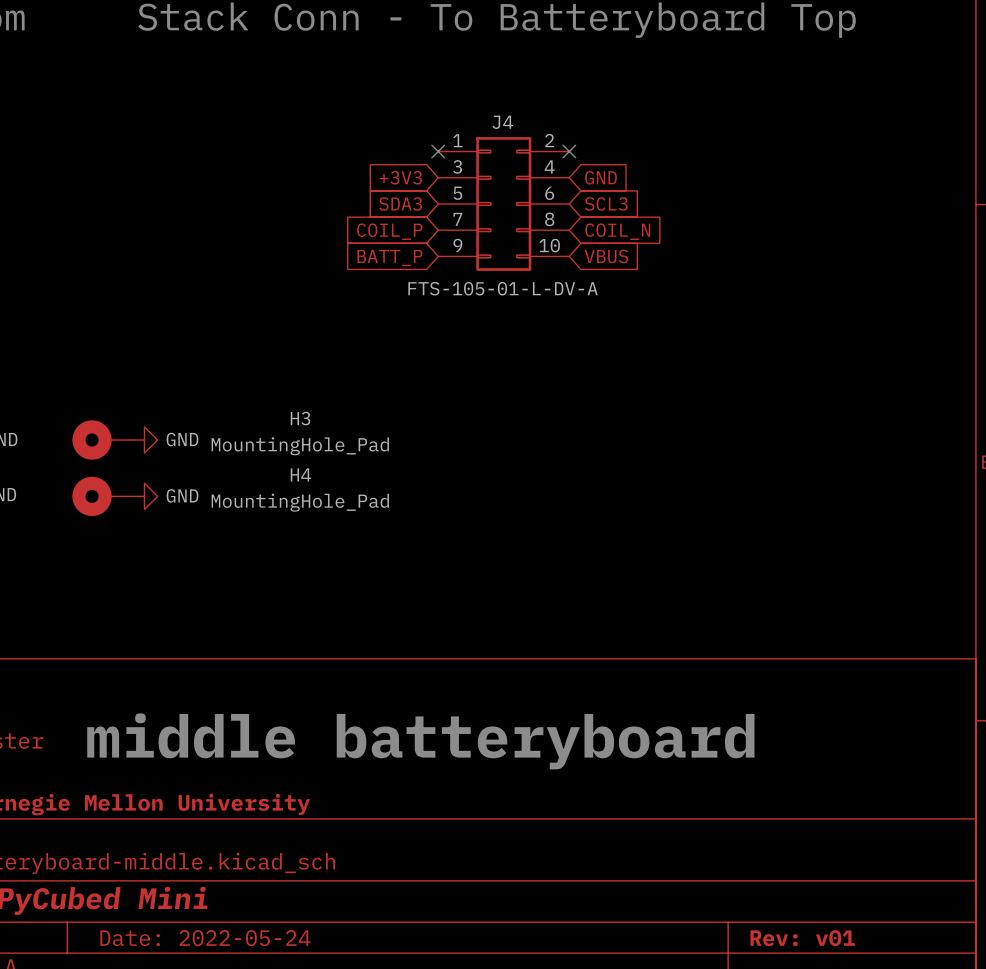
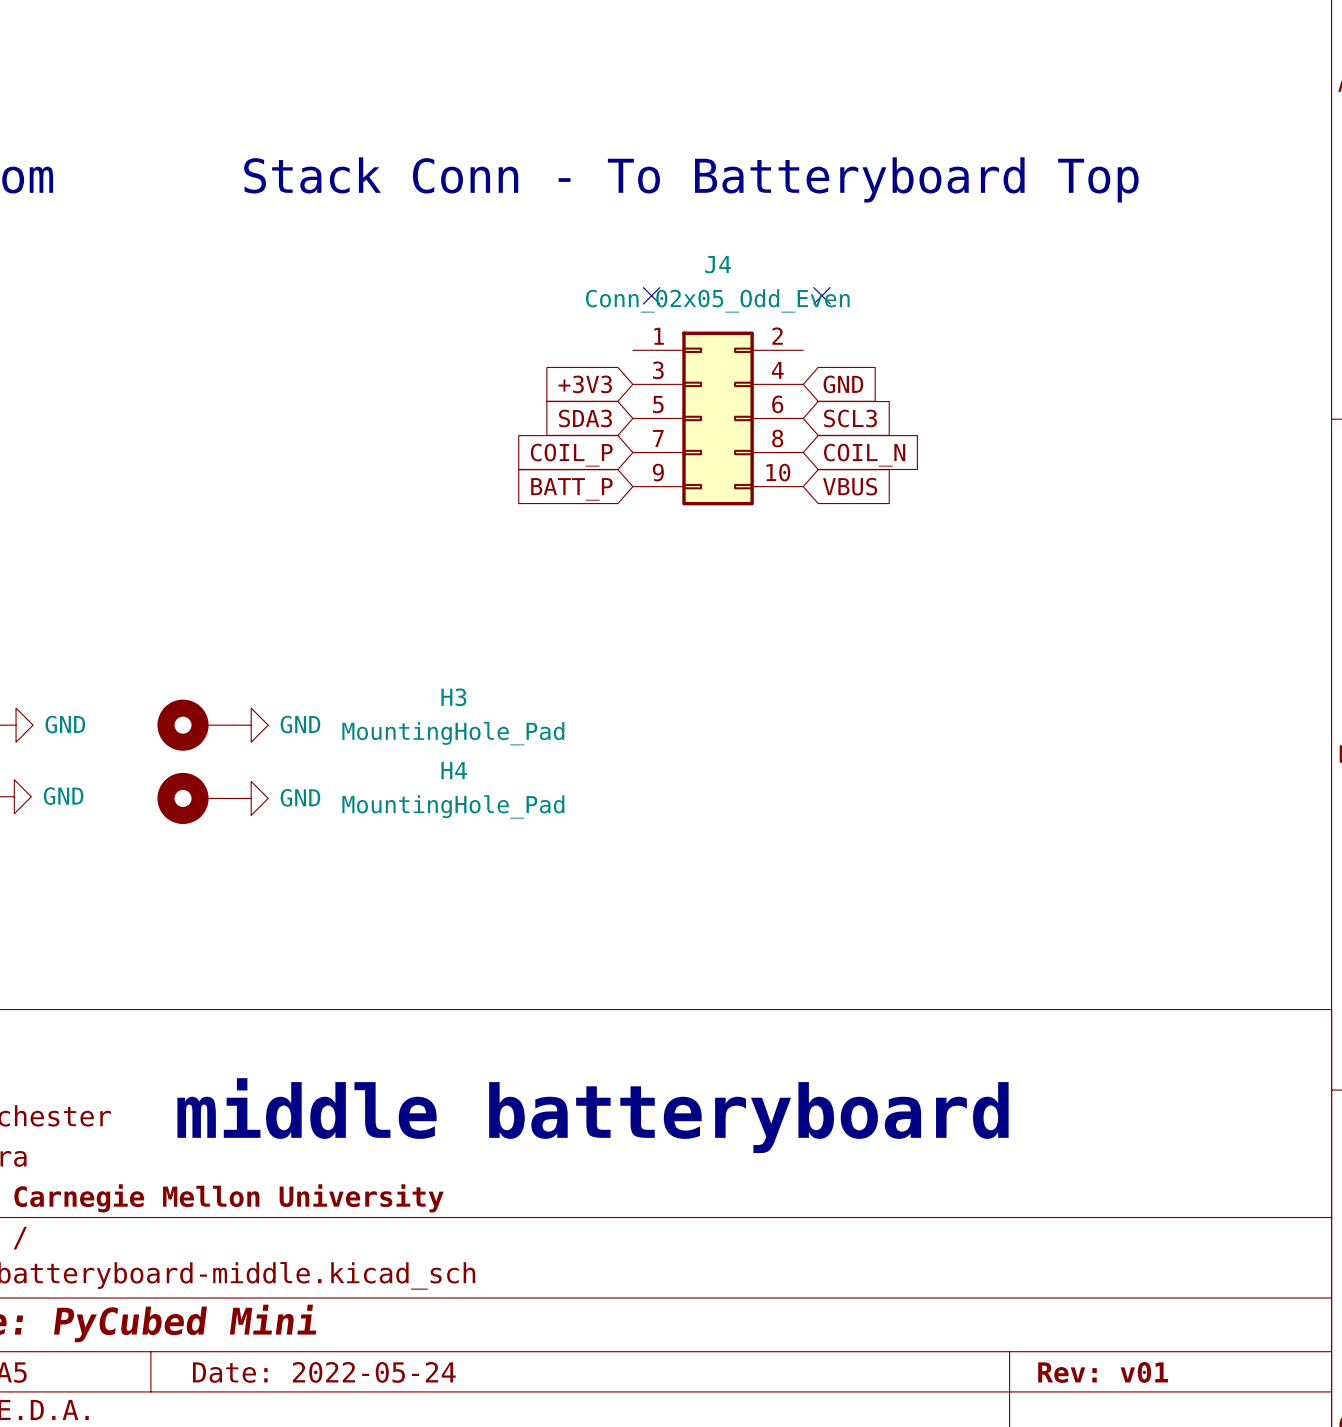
J4 name position: J4 (502, 122) -> J4 (718, 264)
no-connect mark position: (438, 151) -> (651, 295)
no-connect mark position: (569, 151) -> (822, 295)
J4 value: FTS-105-01-L-DV-A (503, 288) -> Conn_02x05_Odd_Even (717, 300)

